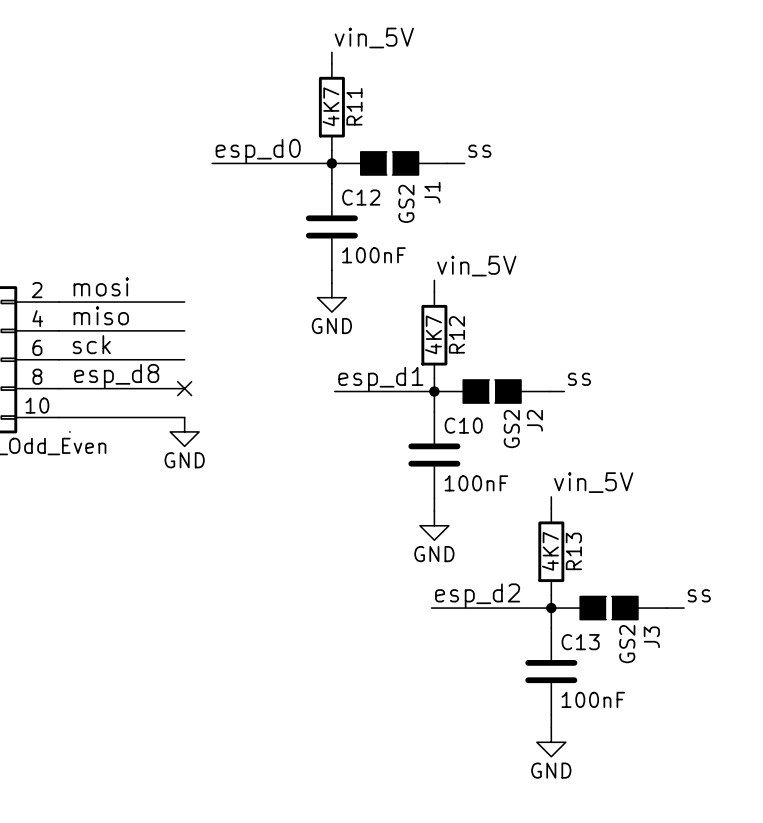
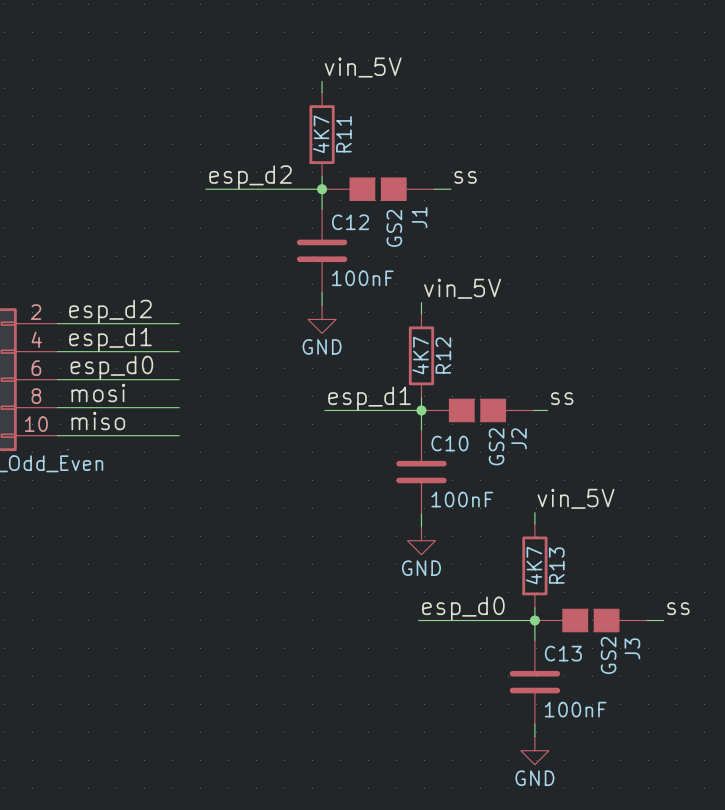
label: esp_d0 (258, 151) -> esp_d2 (250, 177)
label position: mosi (101, 286) -> mosi (98, 393)
label: none -> esp_d2 (110, 311)
label position: miso (101, 315) -> miso (98, 421)
label: none -> esp_d1 (110, 339)
label: sck (91, 344) -> esp_d0 (111, 367)
label: esp_d8 (116, 376) -> none
no-connect mark: (184, 388) -> none
power symbol: GND (184, 431) -> none
label: esp_d2 (477, 595) -> esp_d0 (463, 608)

